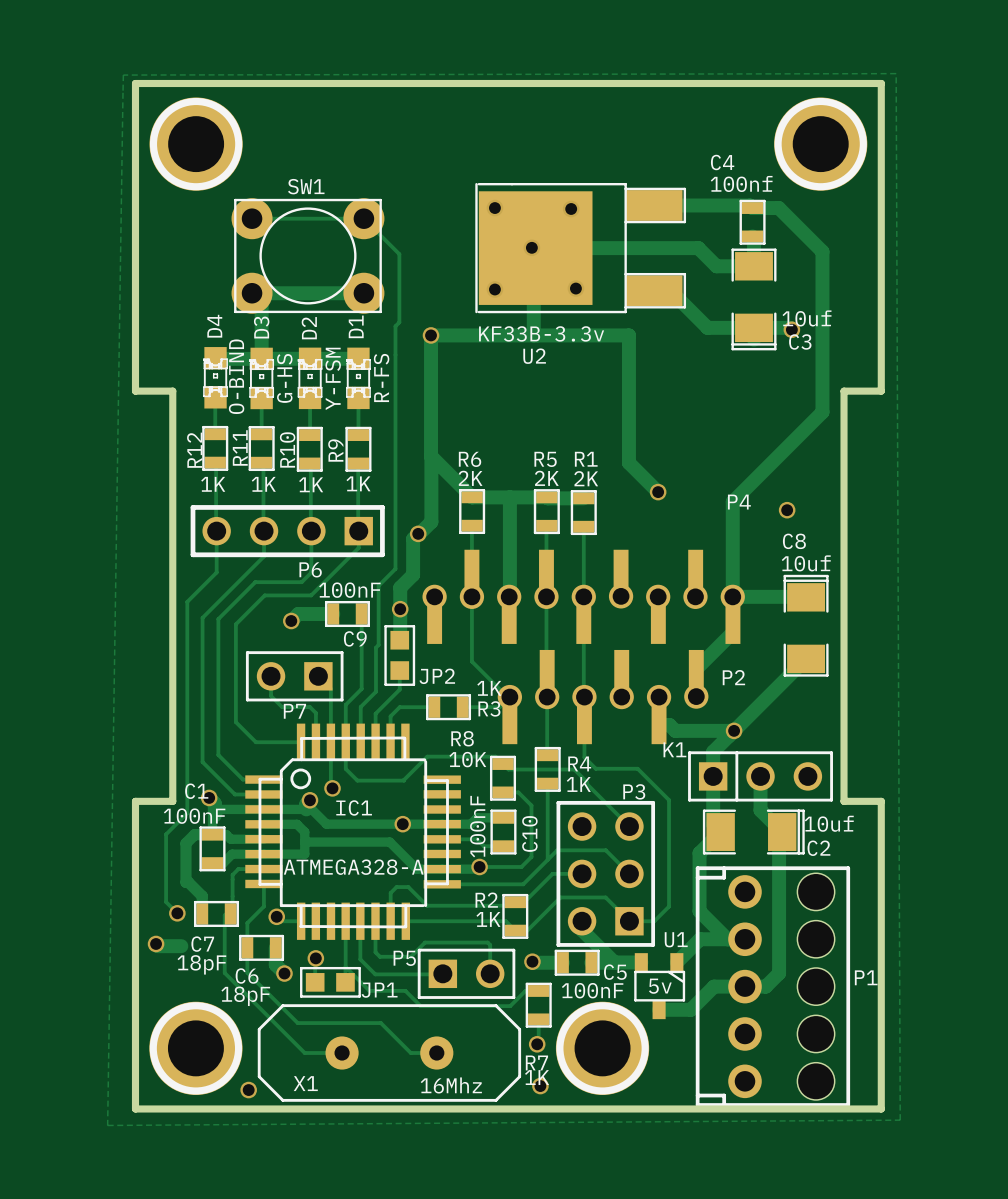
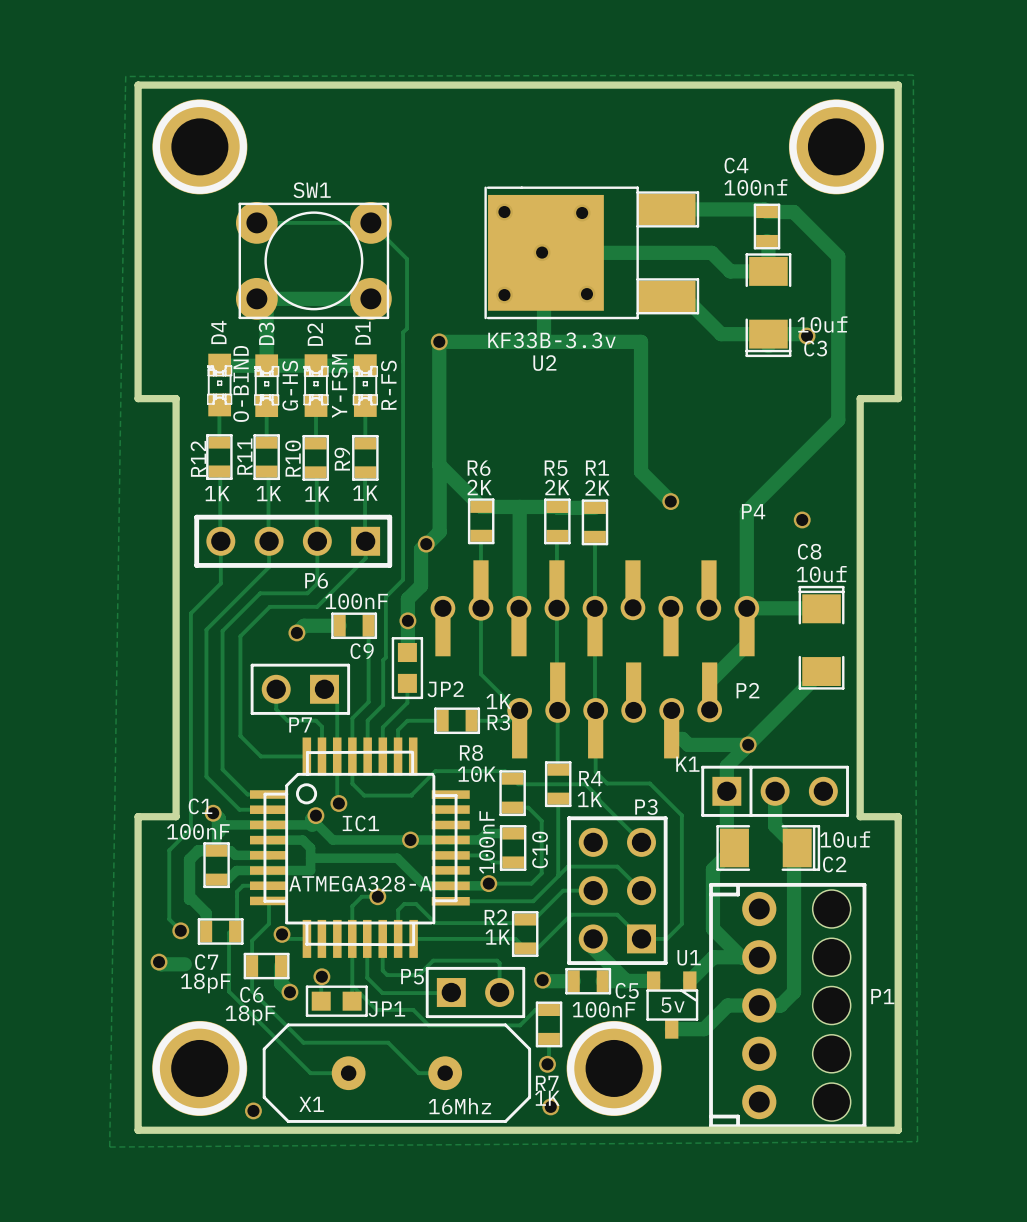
track: none -> (377, 896) (361, 896) (352, 906) (352, 938)
via: none -> (377, 896)

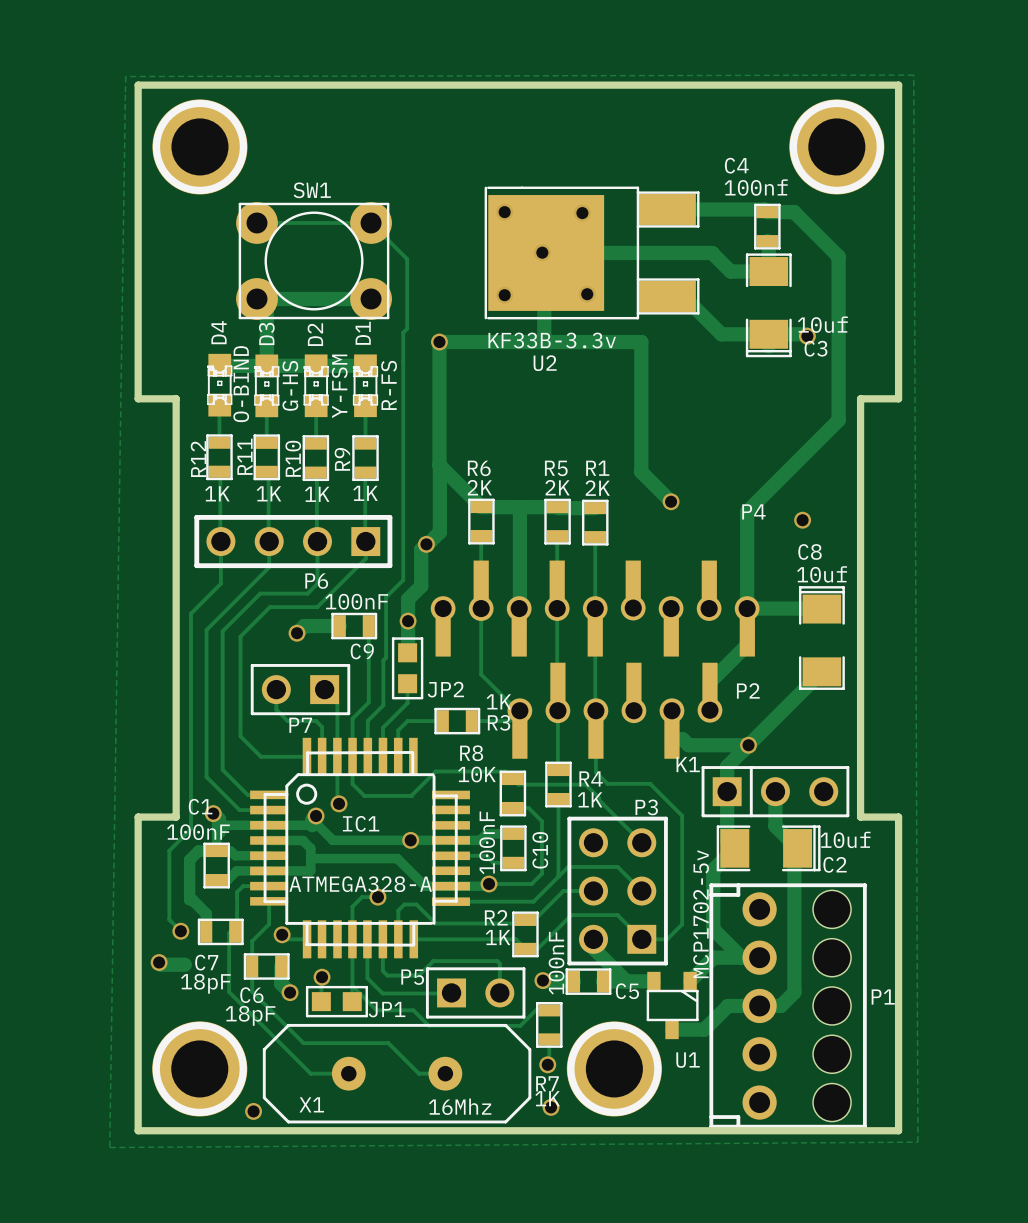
U1 name position: U1 (689, 957) -> U1 (688, 1060)
U1 value: 5v (672, 1005) -> MCP1702-5v (701, 914)
C5 value rotation: 0° (603, 1009) -> 90° counterclockwise (556, 963)

